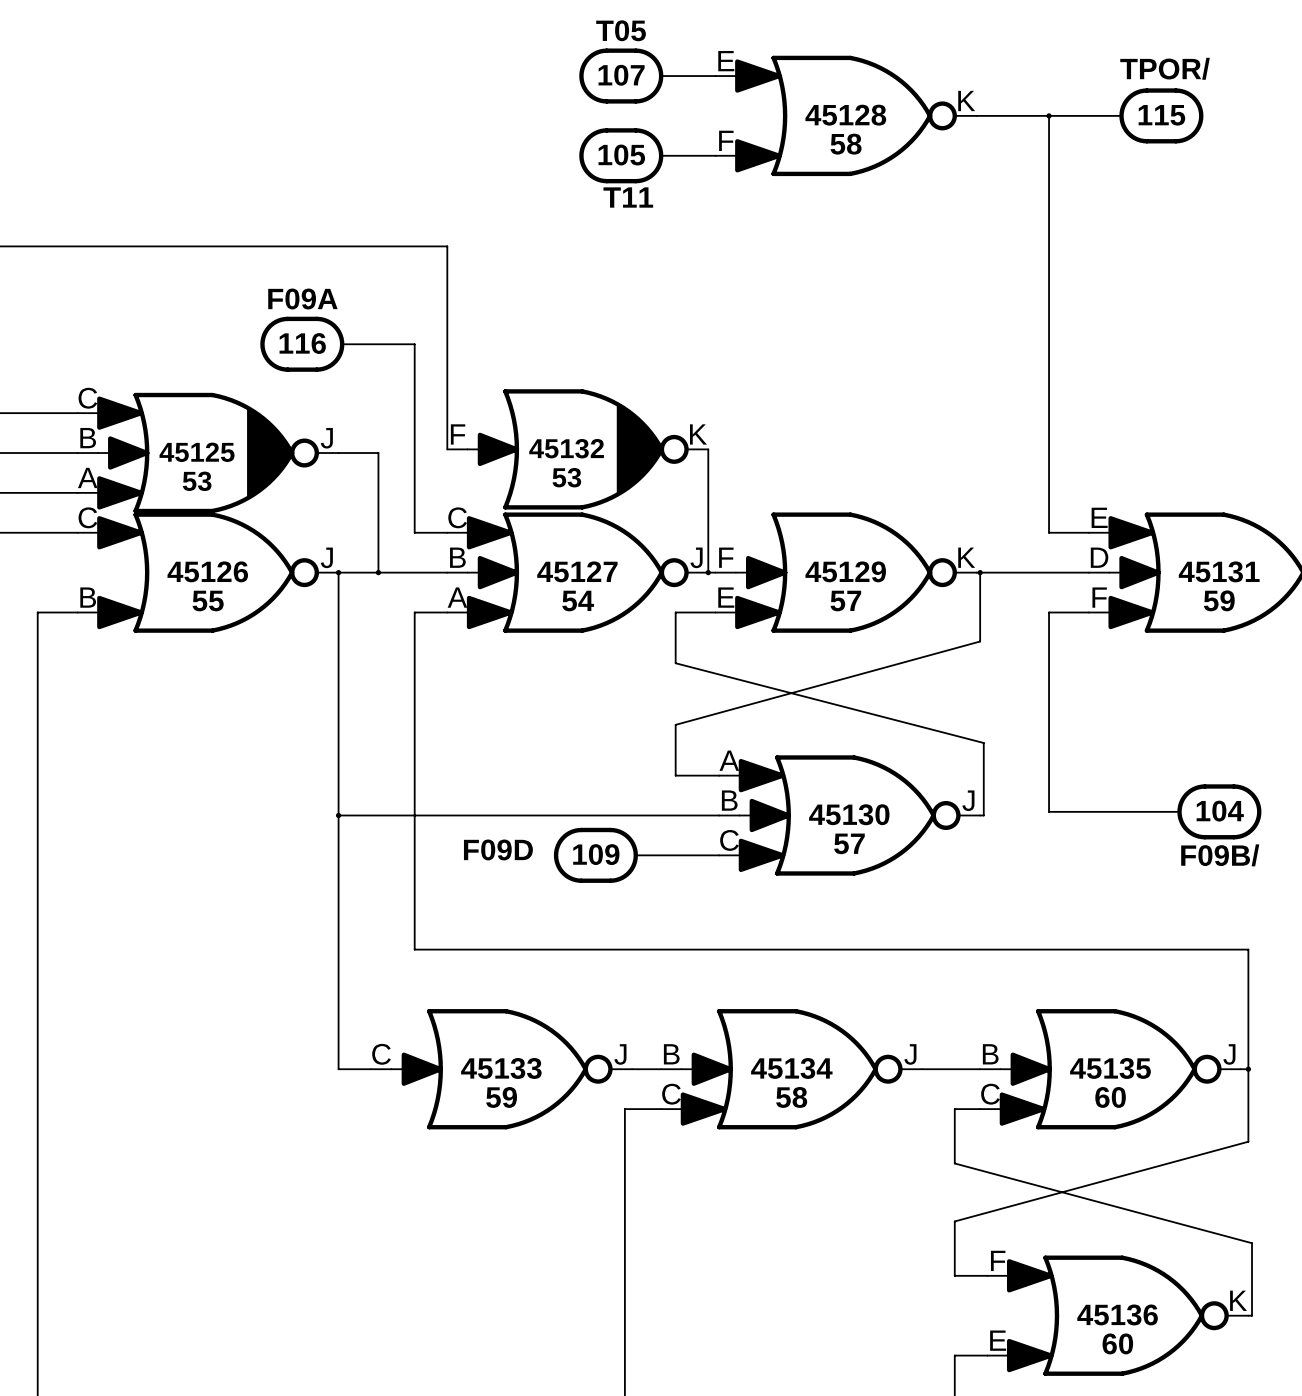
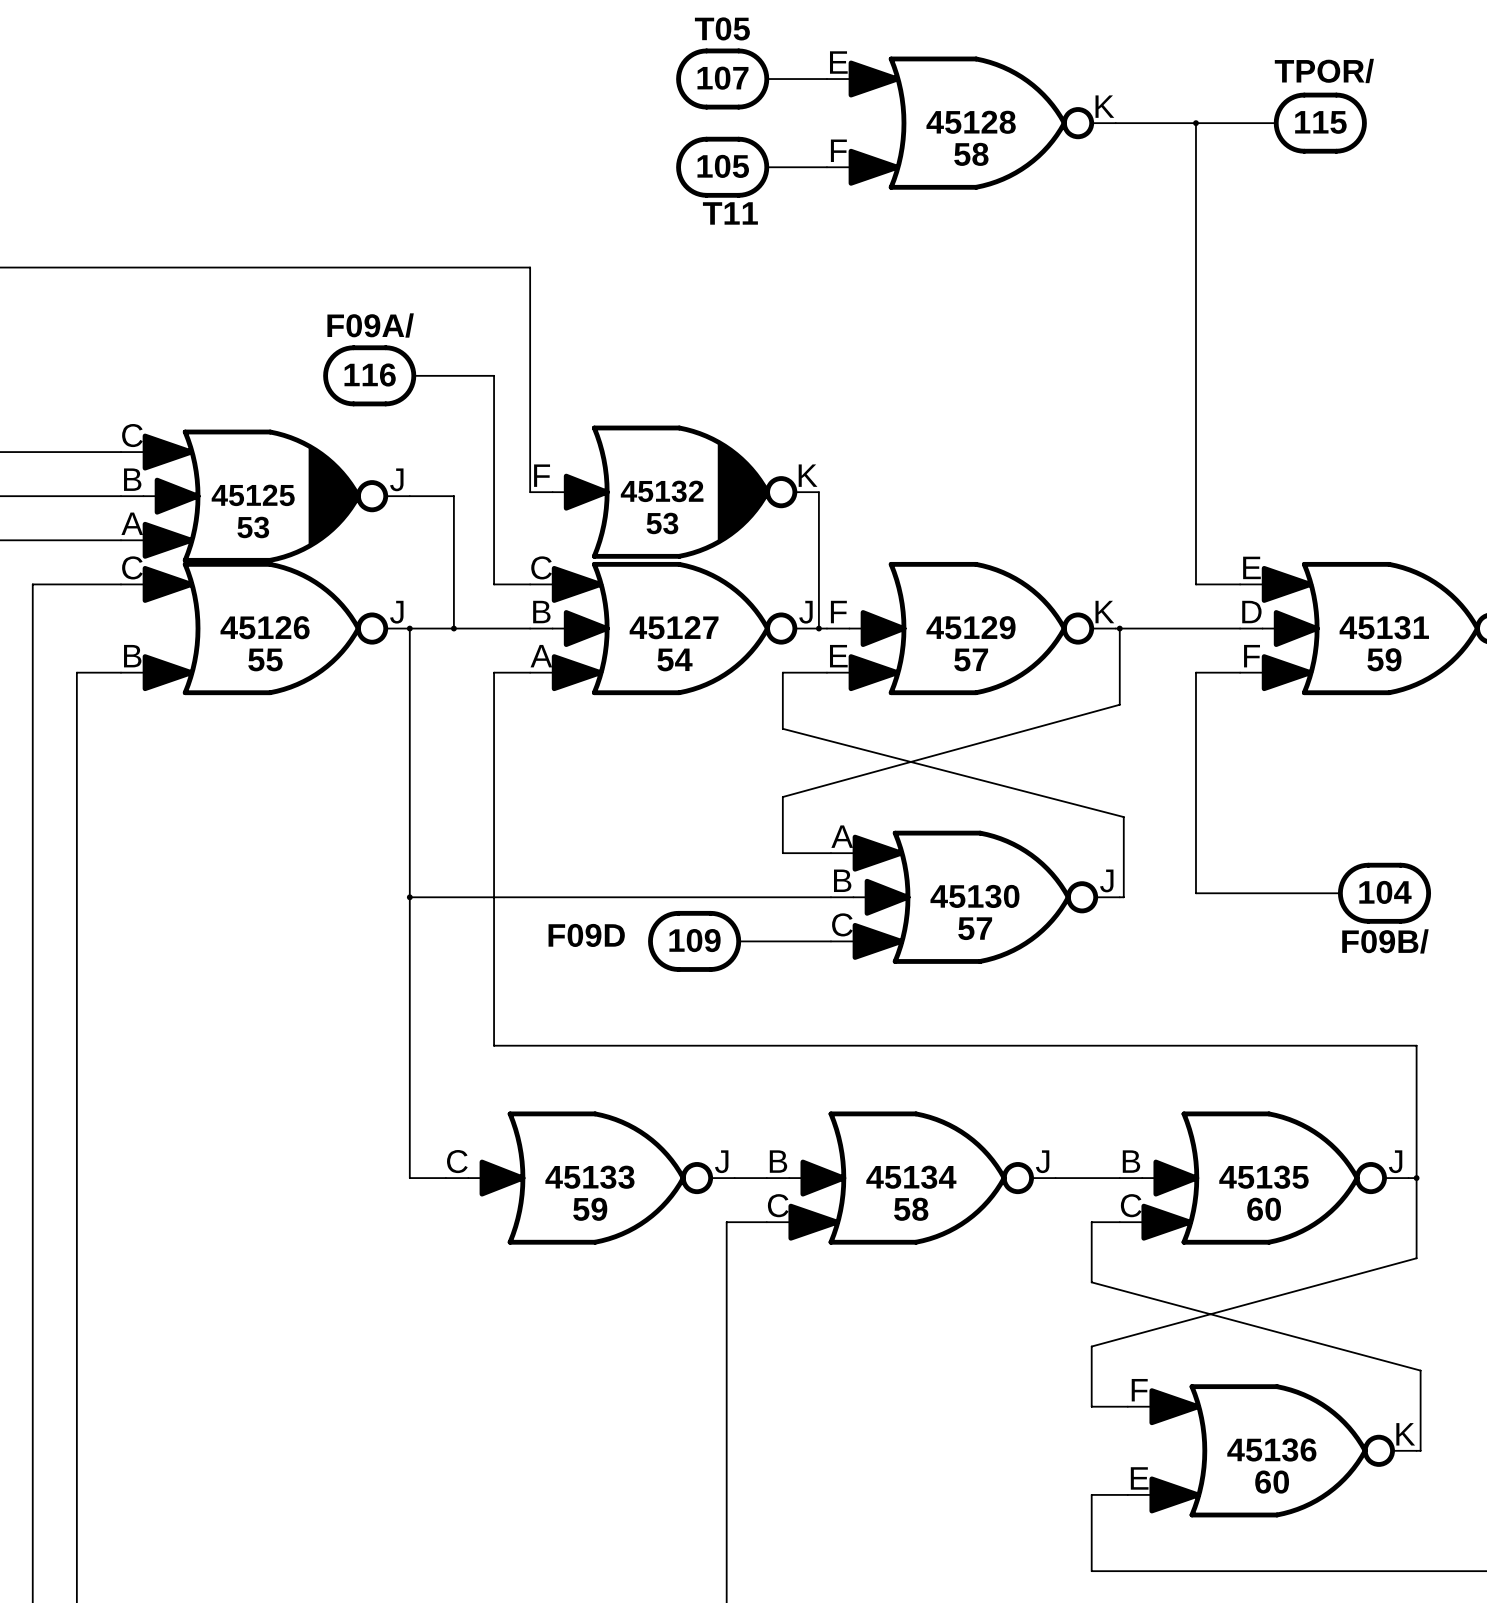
part text: F09A (302, 299) -> F09A/ (370, 325)

